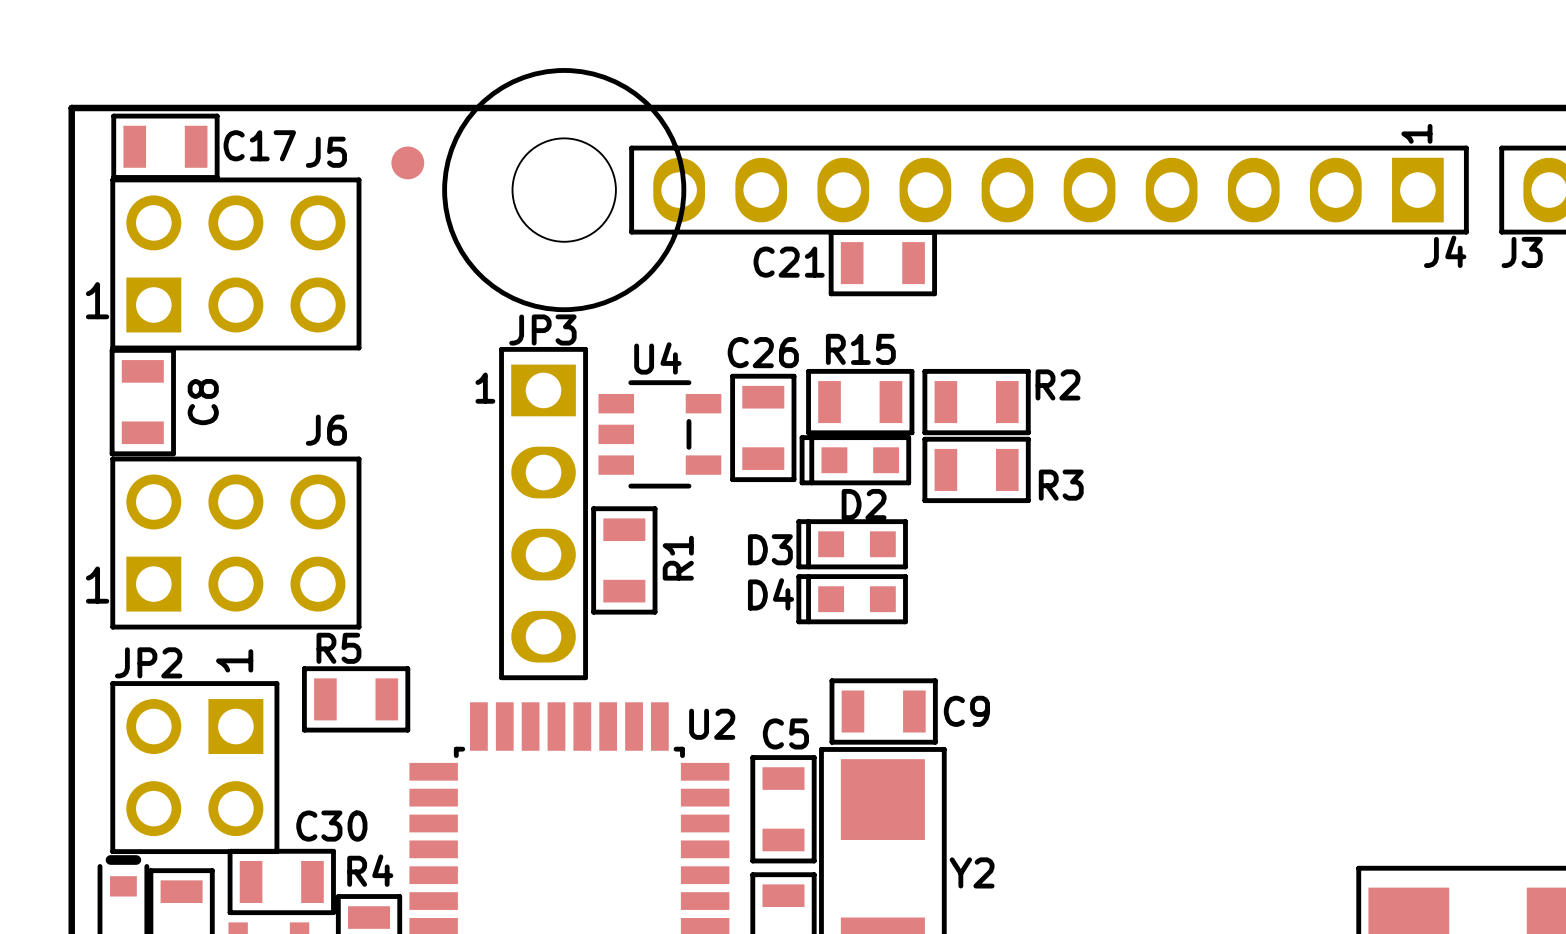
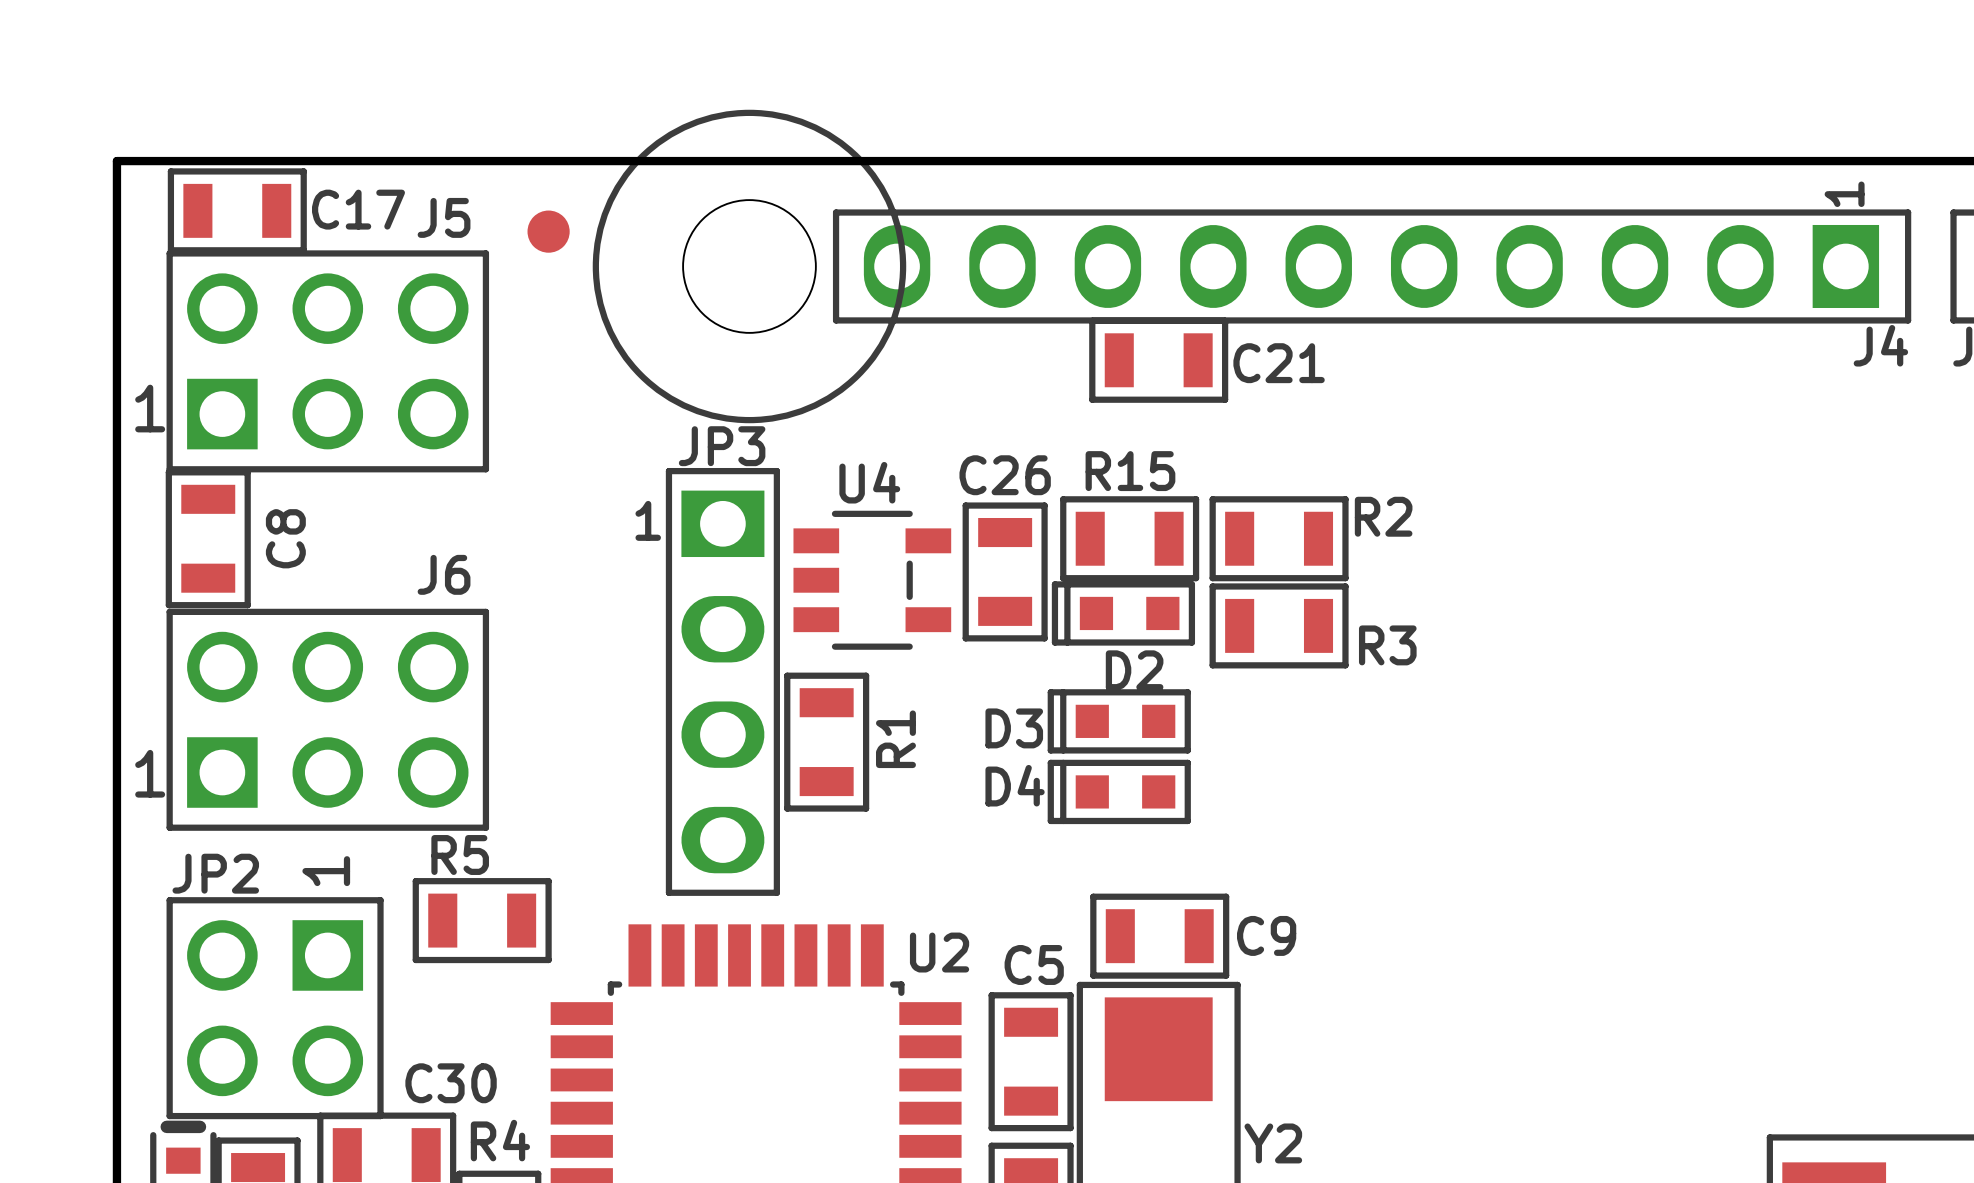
C21 name position: C21 (789, 262) -> C21 (1279, 363)

